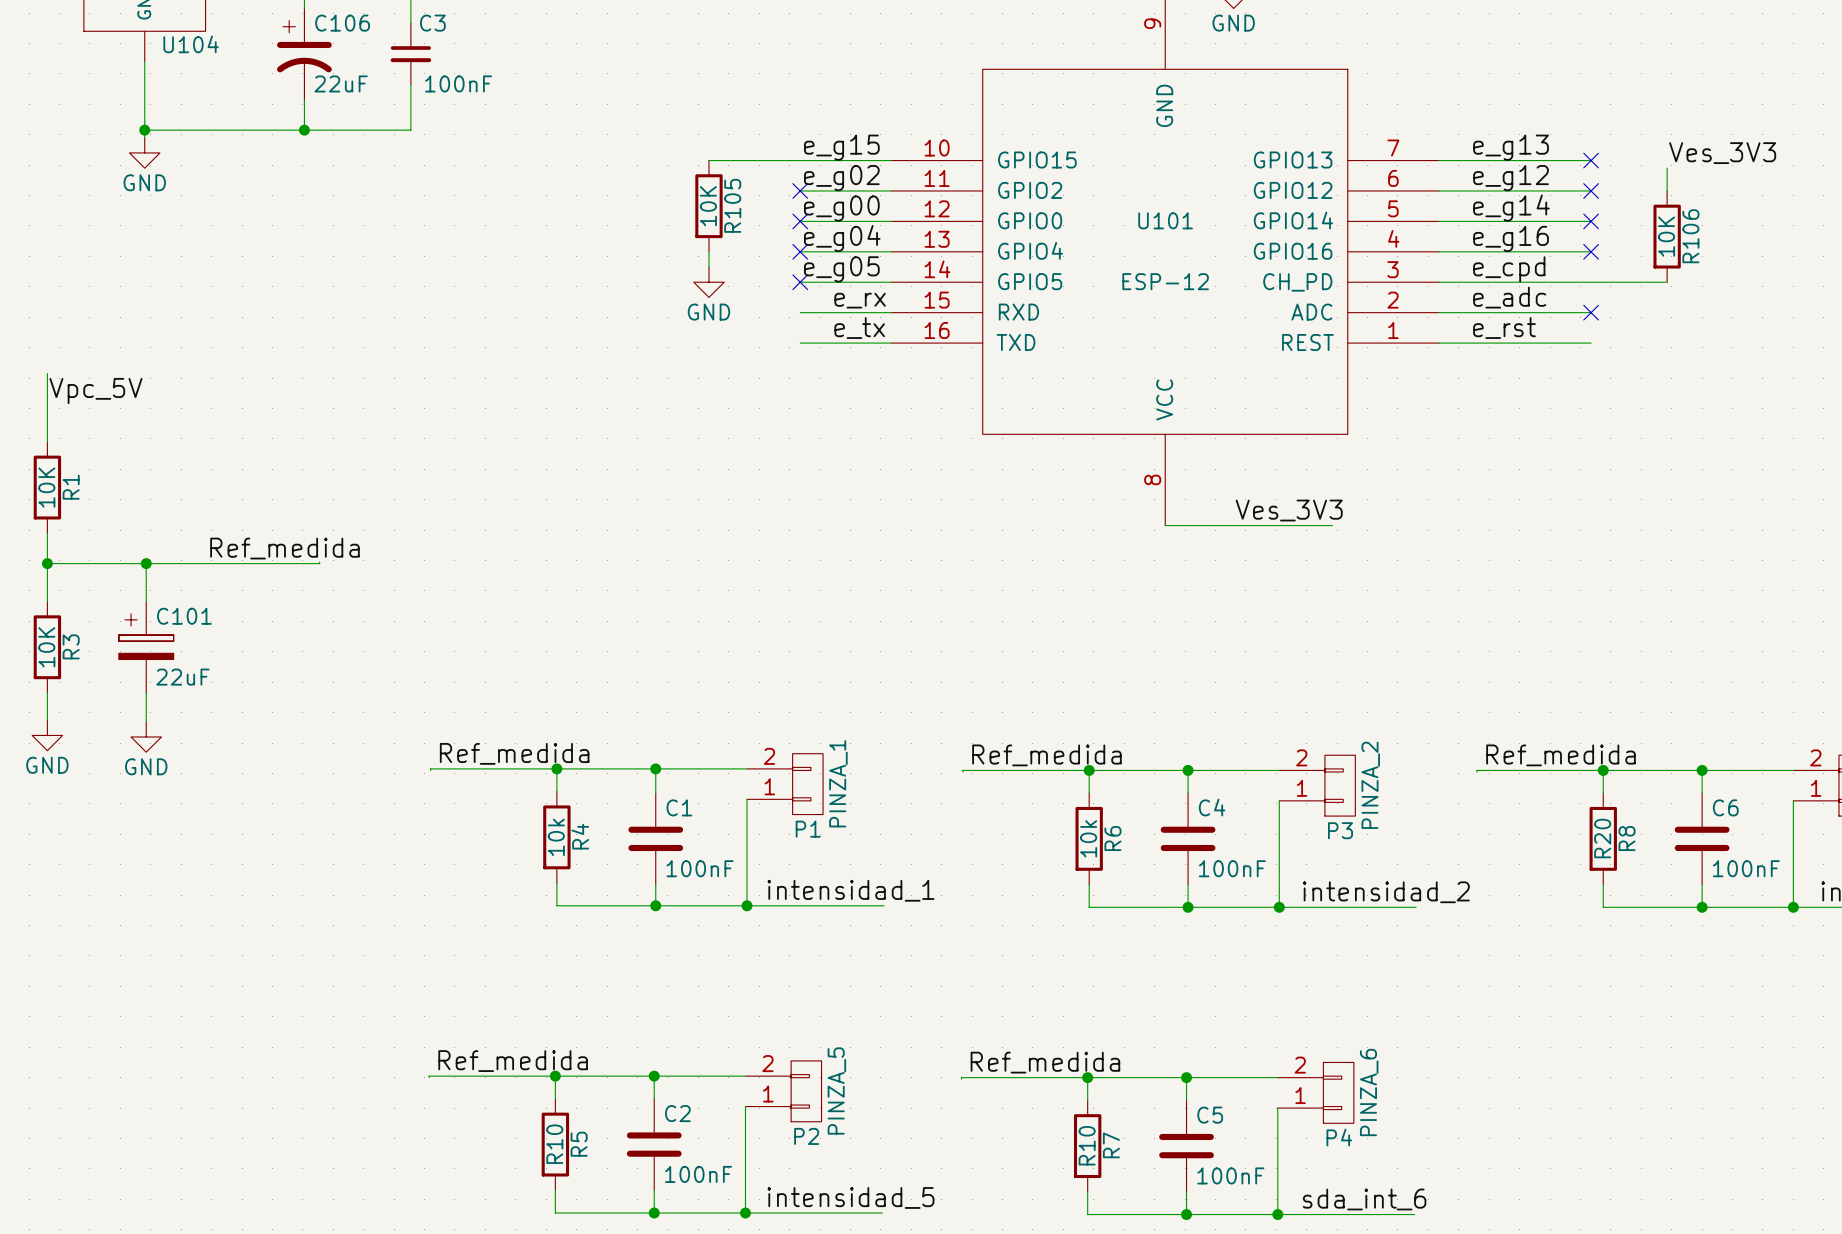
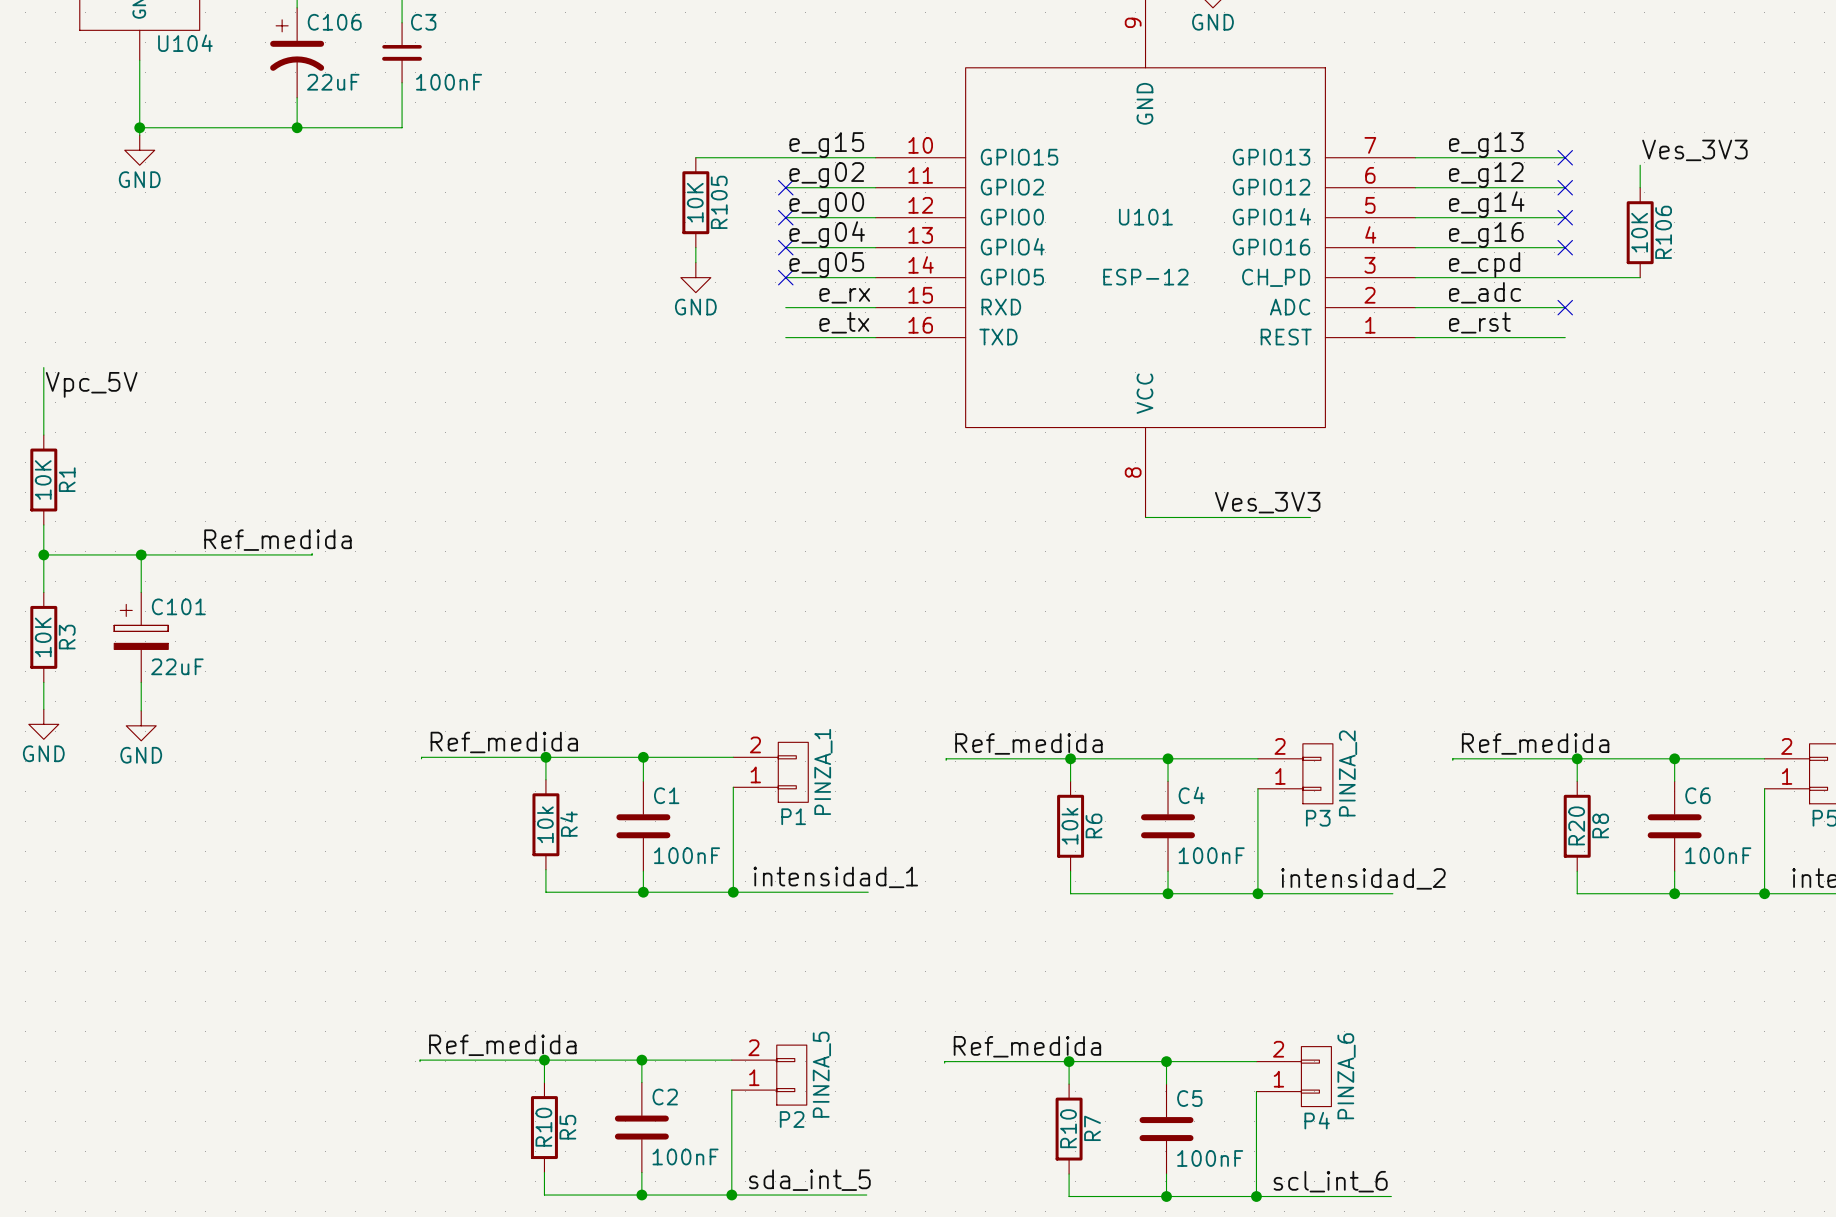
label: intensidad_5 (850, 1197) -> sda_int_5 (809, 1180)
label: sda_int_6 (1364, 1199) -> scl_int_6 (1330, 1181)

